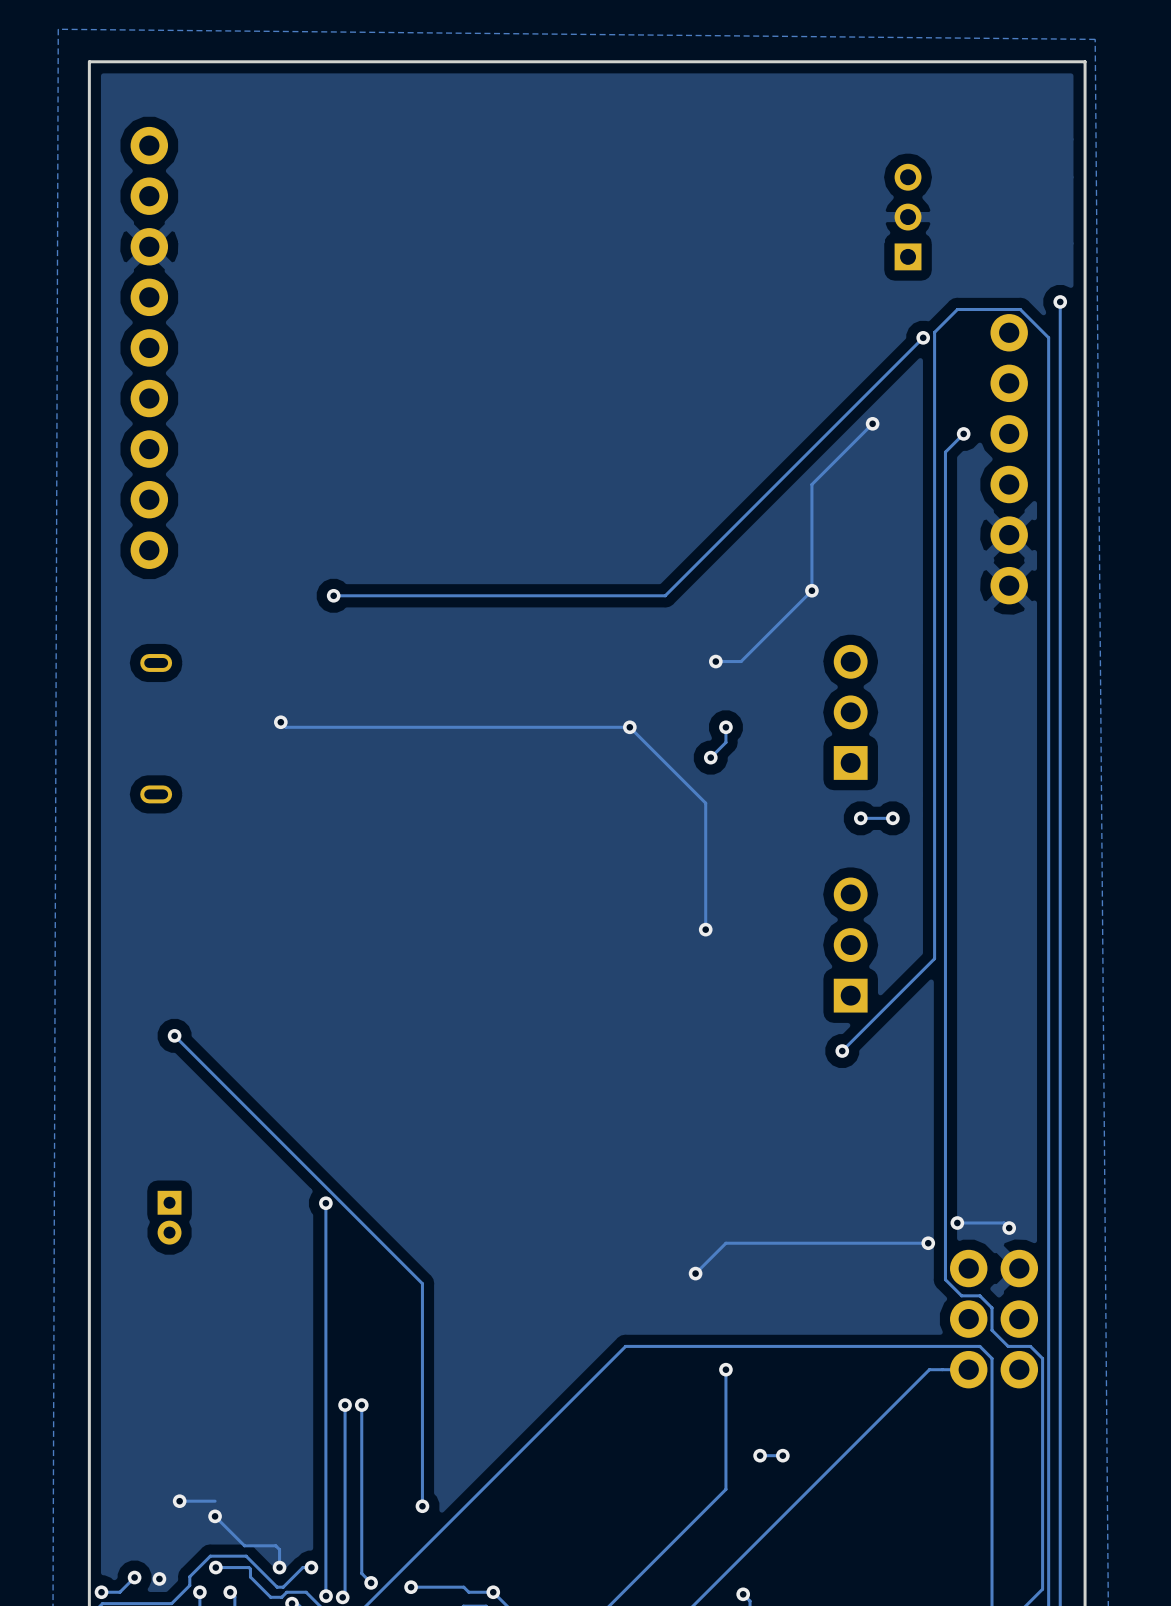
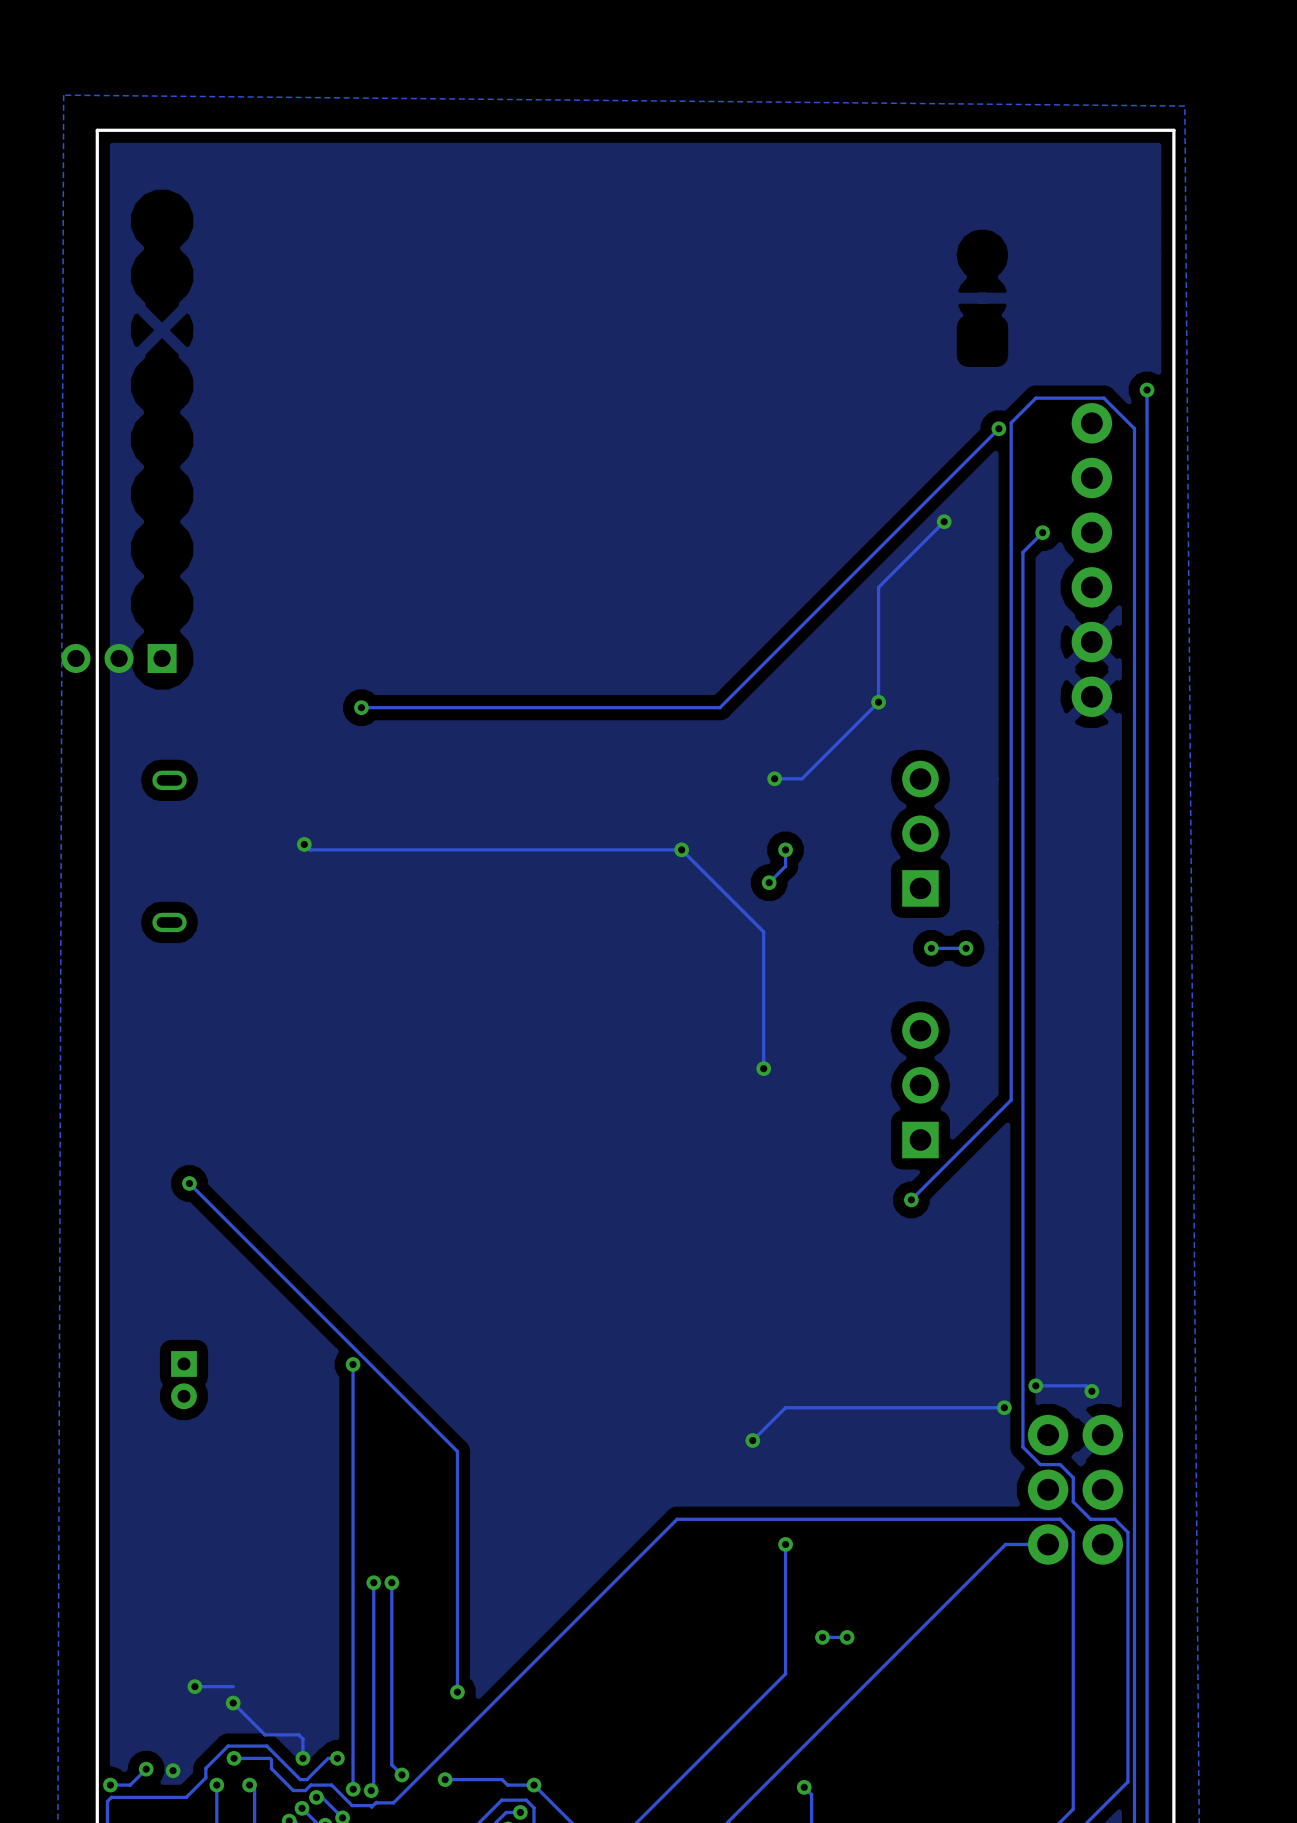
part: (908, 217) -> none
part: (149, 347) -> none
part: none -> (119, 658)

